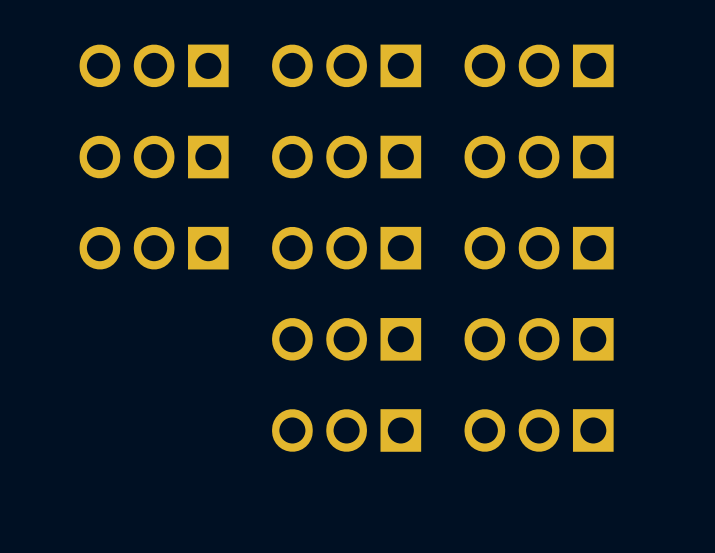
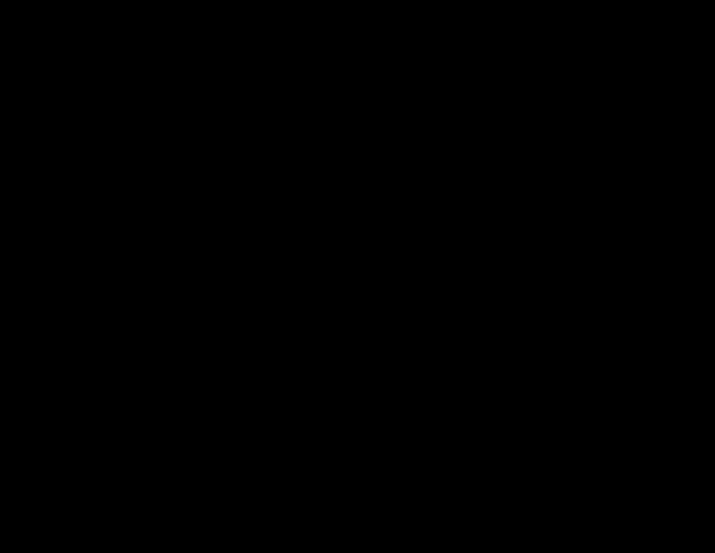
part: (154, 65) -> none
part: (346, 65) -> none
part: (539, 65) -> none
part: (154, 157) -> none
part: (346, 157) -> none
part: (539, 157) -> none
part: (154, 248) -> none
part: (346, 248) -> none
part: (539, 248) -> none
part: (346, 339) -> none
part: (539, 339) -> none
part: (346, 430) -> none
part: (539, 430) -> none

